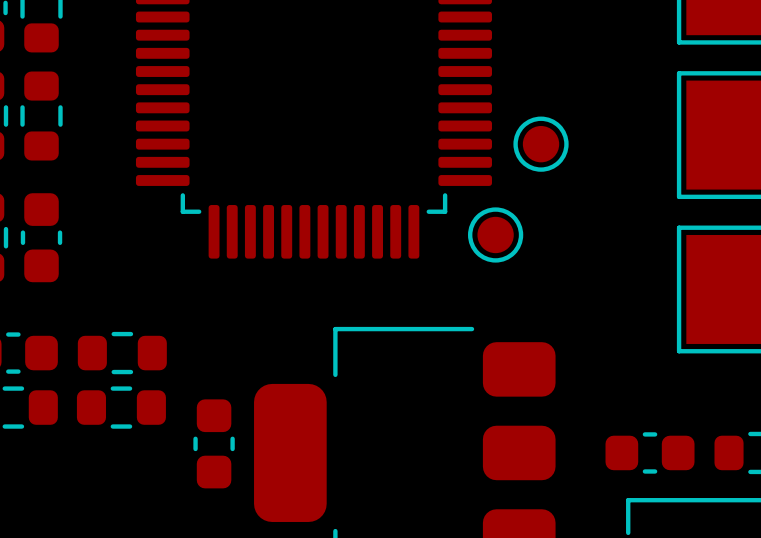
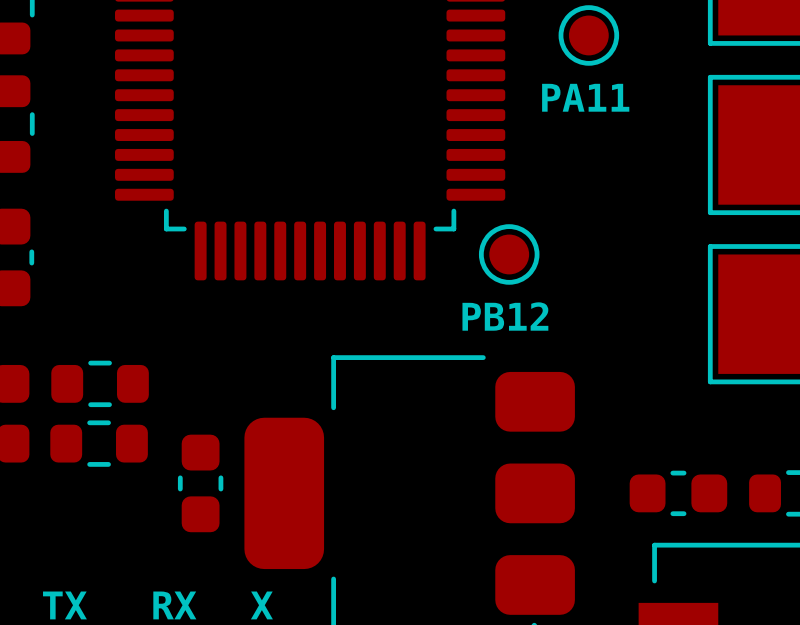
part: none -> (588, 35)
text: none -> PA11 (585, 97)
part: (541, 144) -> none
text: none -> PB12 (505, 316)

